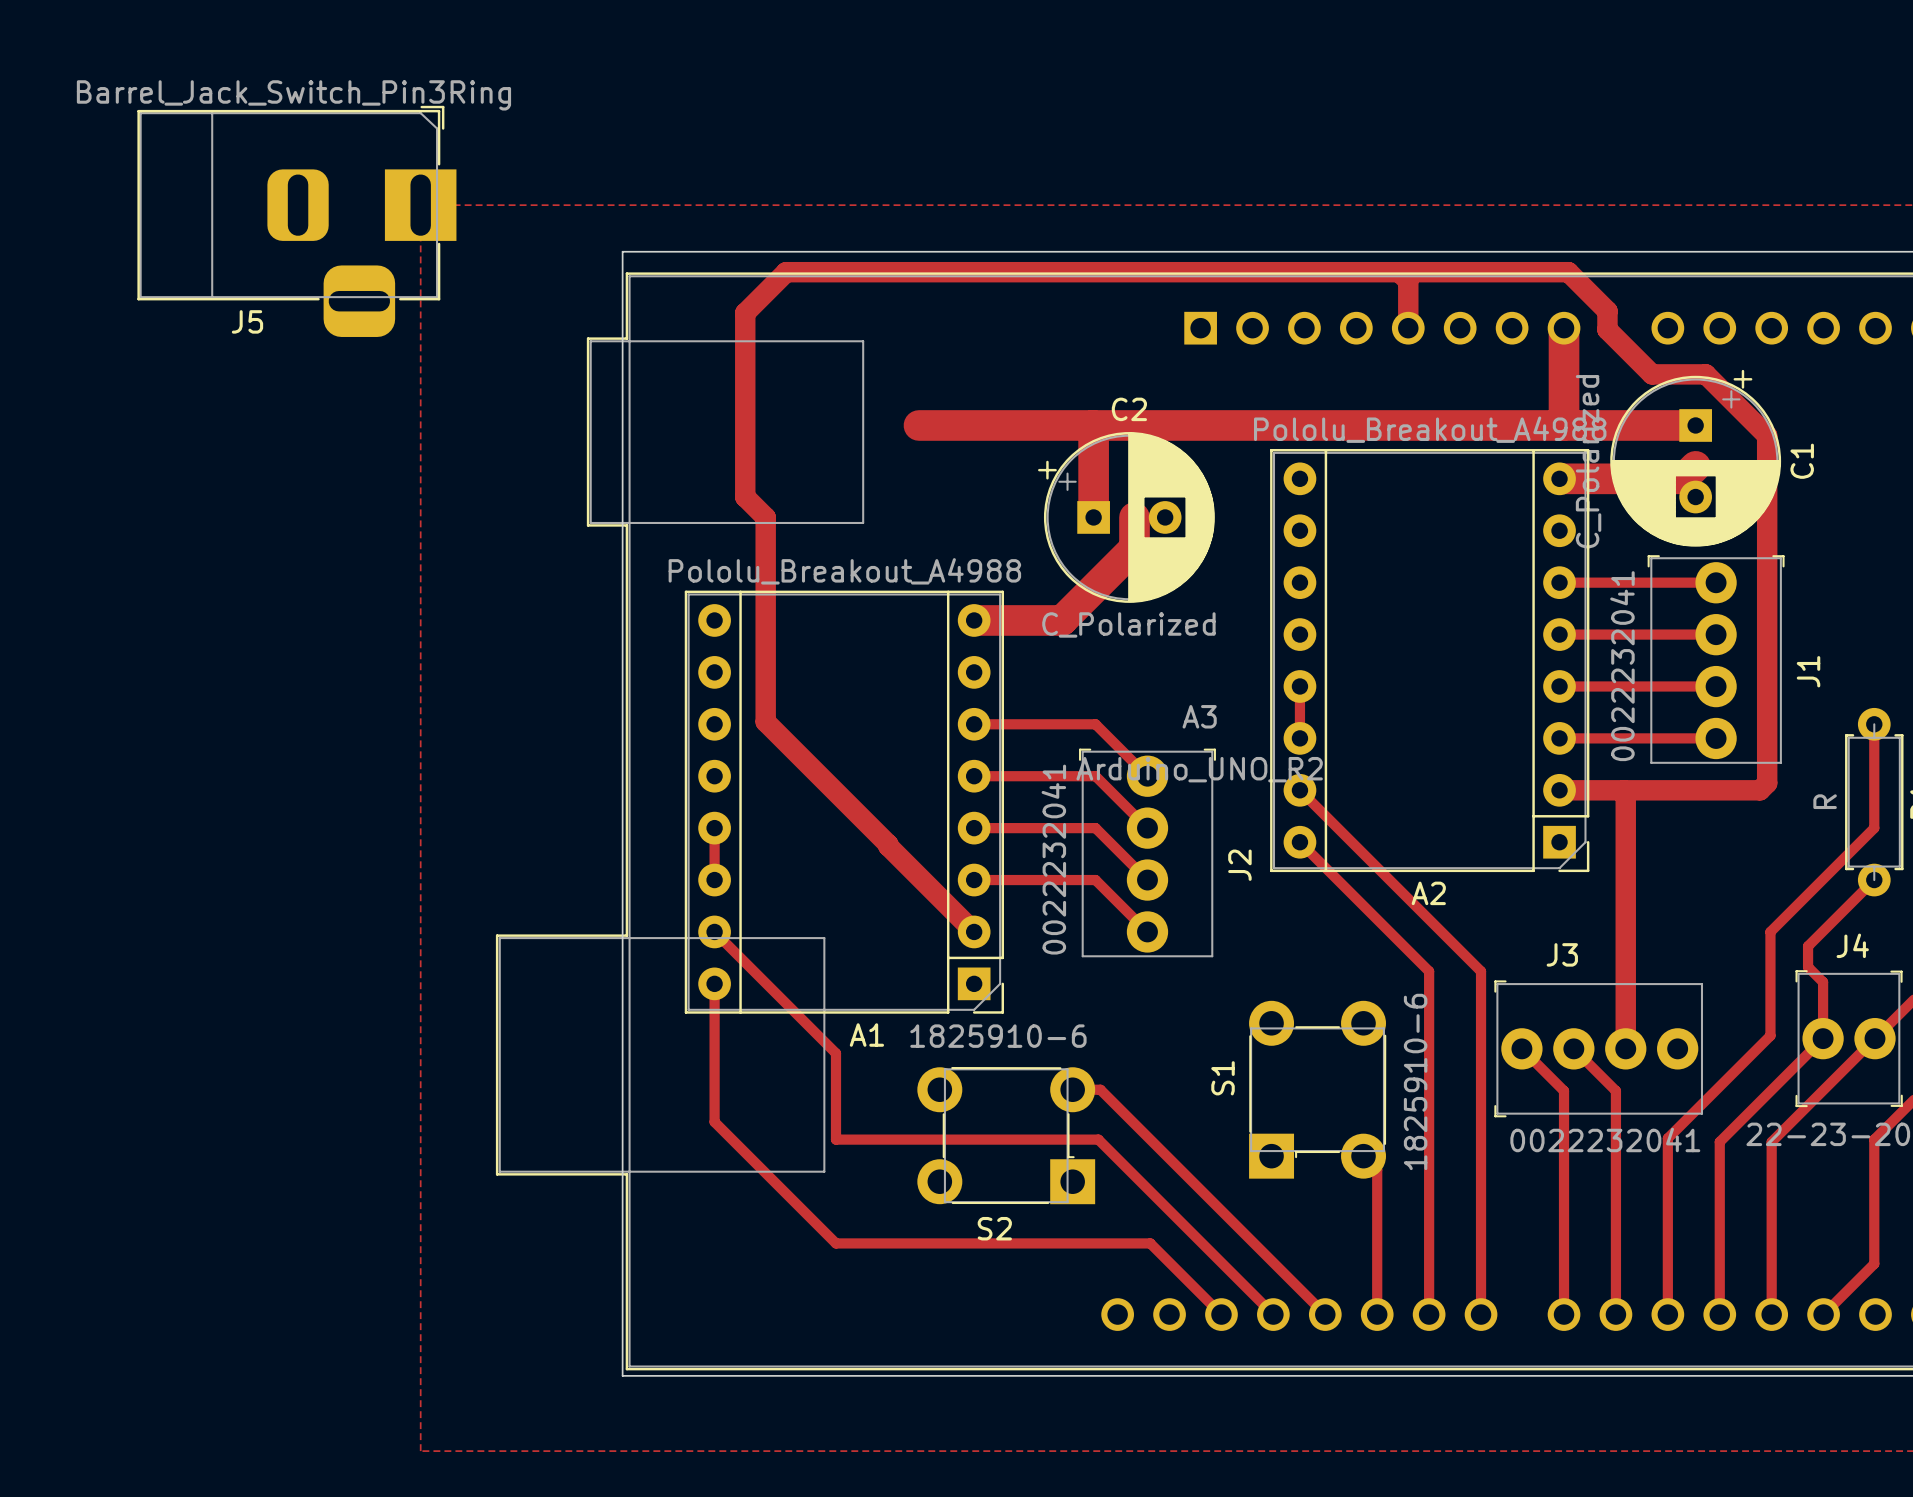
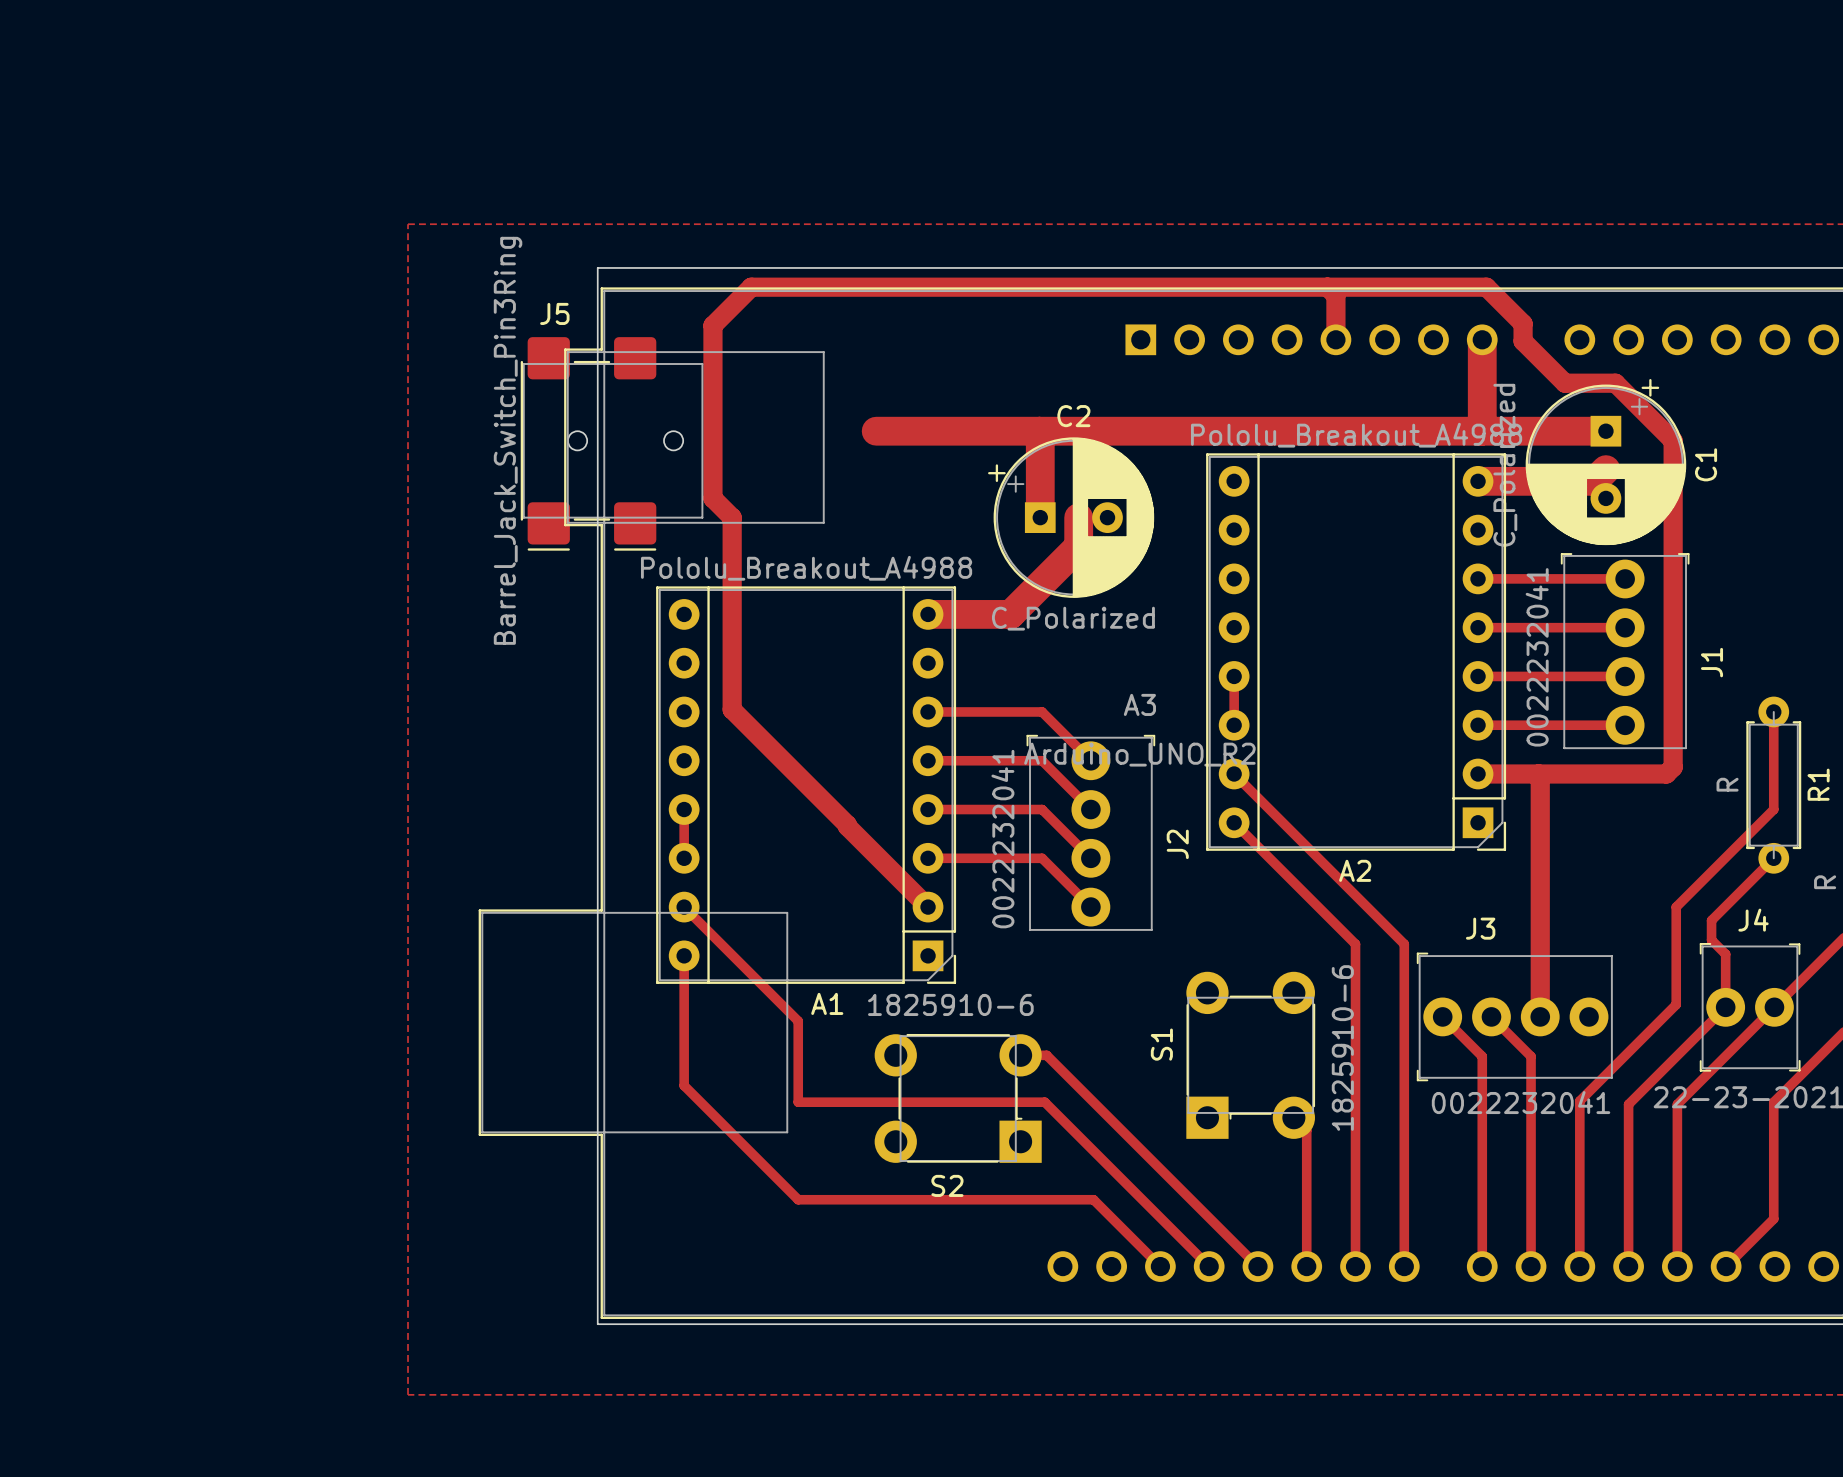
J5 value position: Barrel_Jack_Switch_Pin3Ring (293, 95) -> Barrel_Jack_Switch_Pin3Ring (508, 440)
J5 footprint: [137, 105, 457, 337] -> [520, 337, 704, 551]
J5 name position: J5 (247, 321) -> J5 (554, 313)

